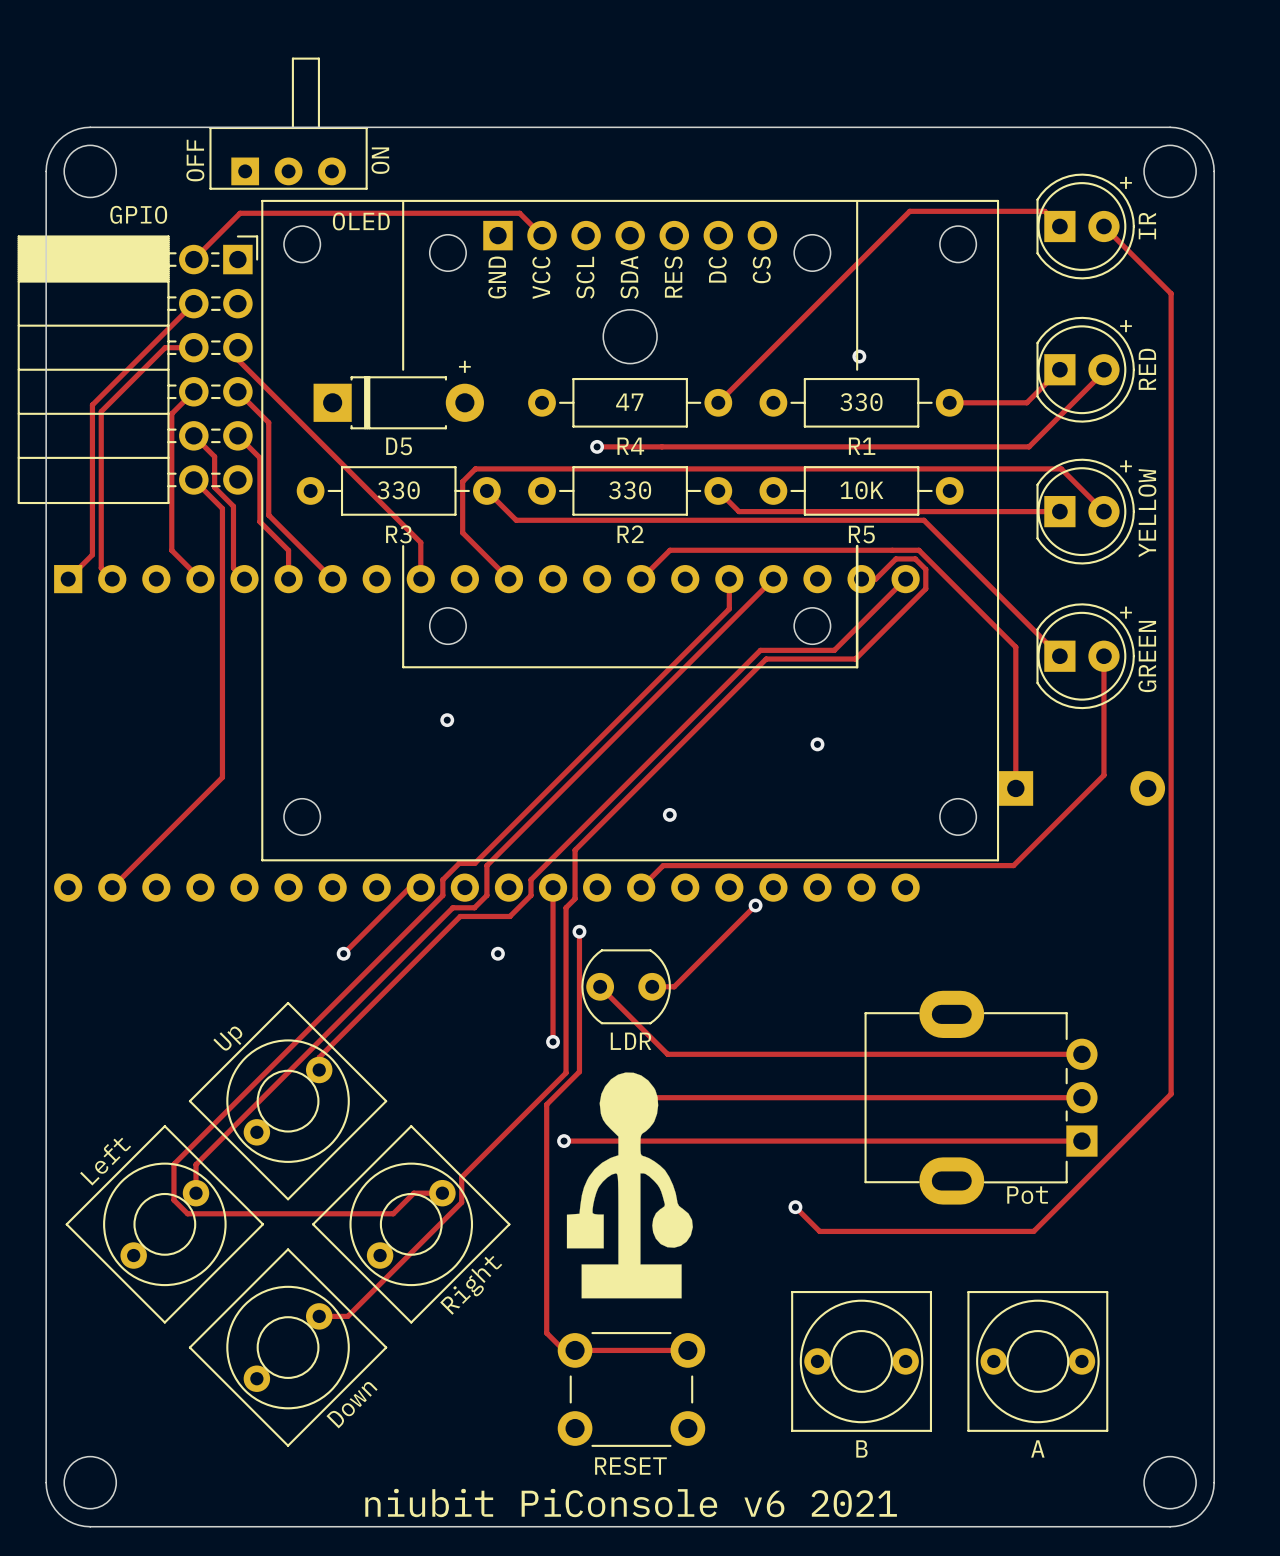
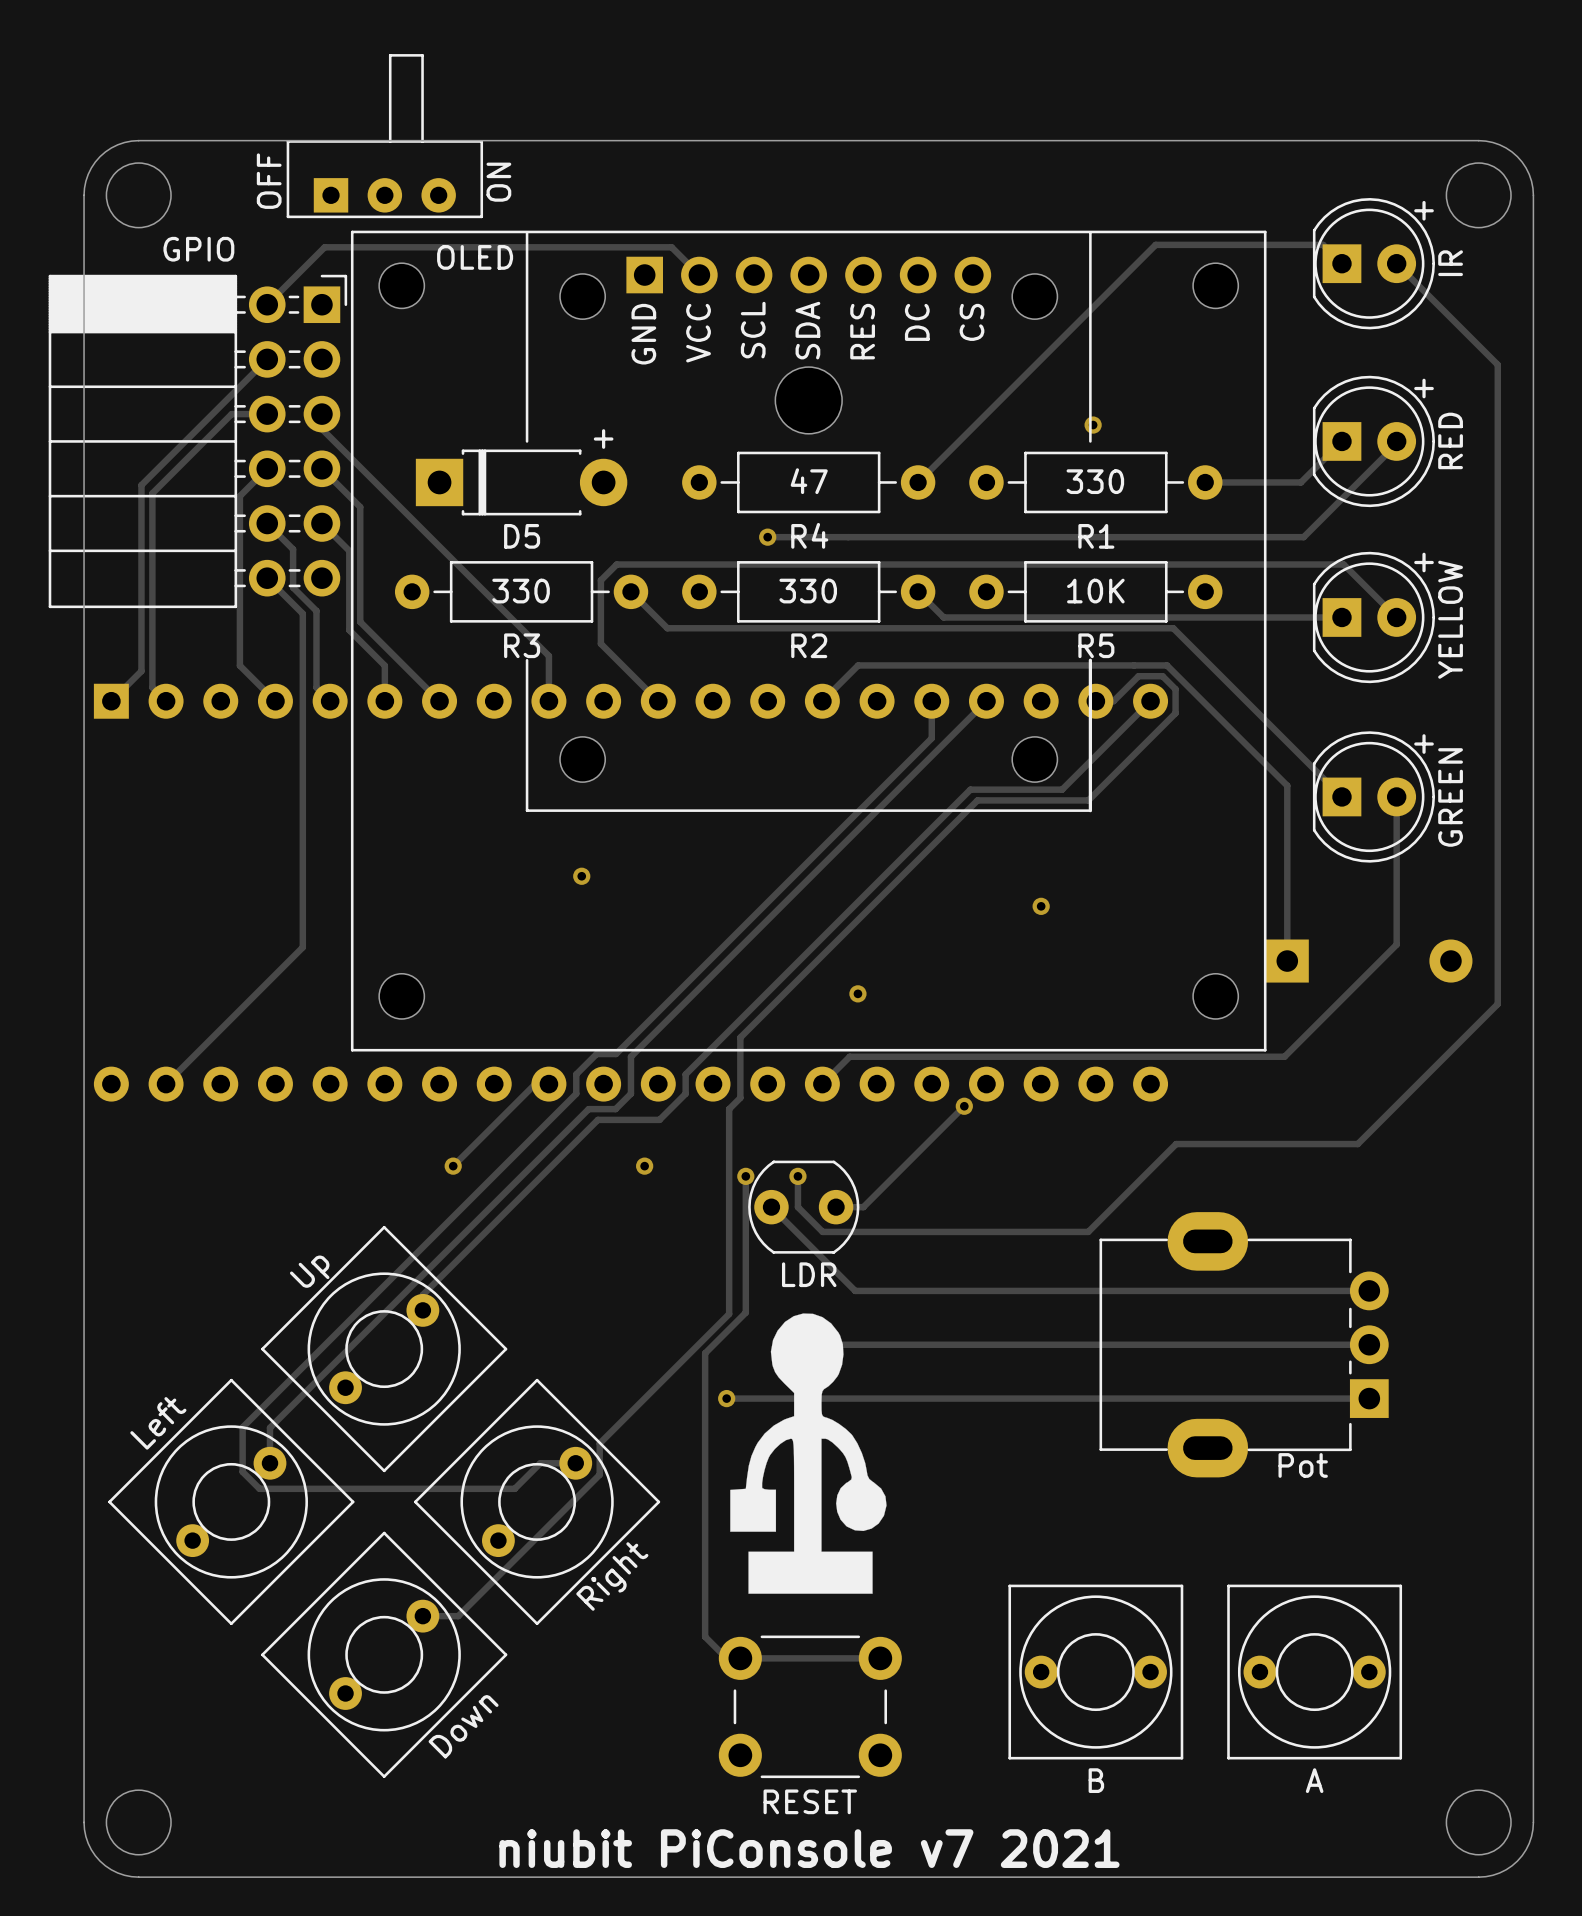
track: (1171, 293) (1171, 1094) (1033, 1231) (819, 1231) (795, 1207) -> (1480, 347) (1497, 364) (1497, 1004) (1357, 1144) (1176, 1144) (1088, 1231) (822, 1231) (797, 1207) (797, 1176)
track: (553, 887) (553, 1041) -> none
track: (579, 931) (579, 961) -> none
via: (579, 931) -> none
via: none -> (745, 1176)
via: none -> (797, 1176)
via: (553, 1041) -> none
via: (795, 1207) -> none
text: niubit PiConsole v6 2021 (631, 1503) -> niubit PiConsole v7 2021 (809, 1848)

